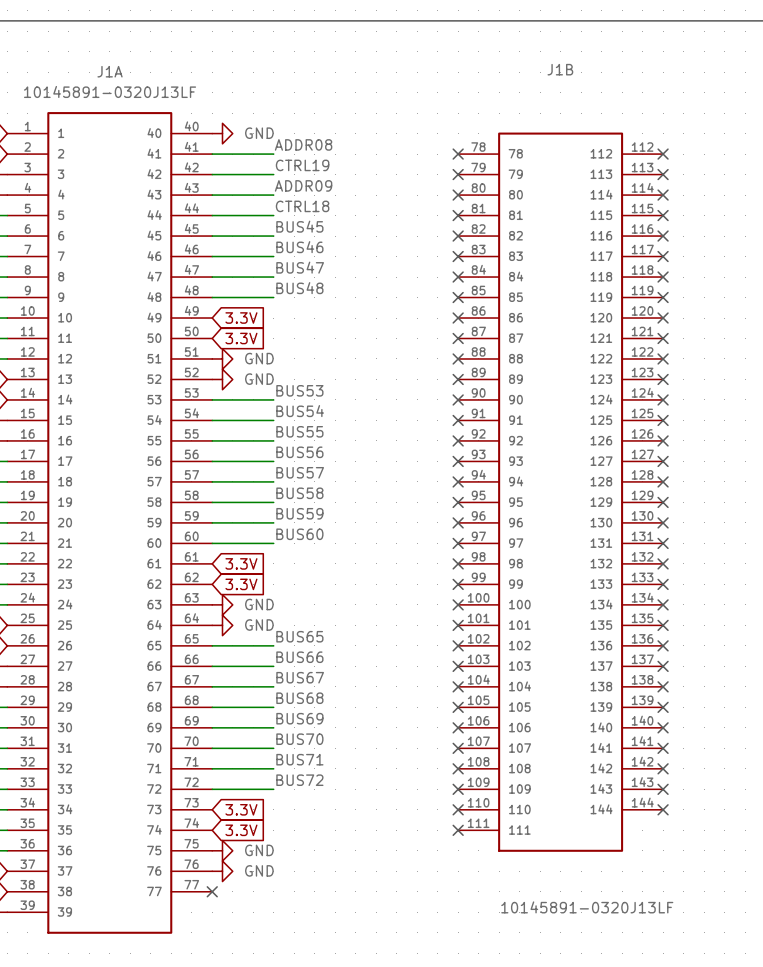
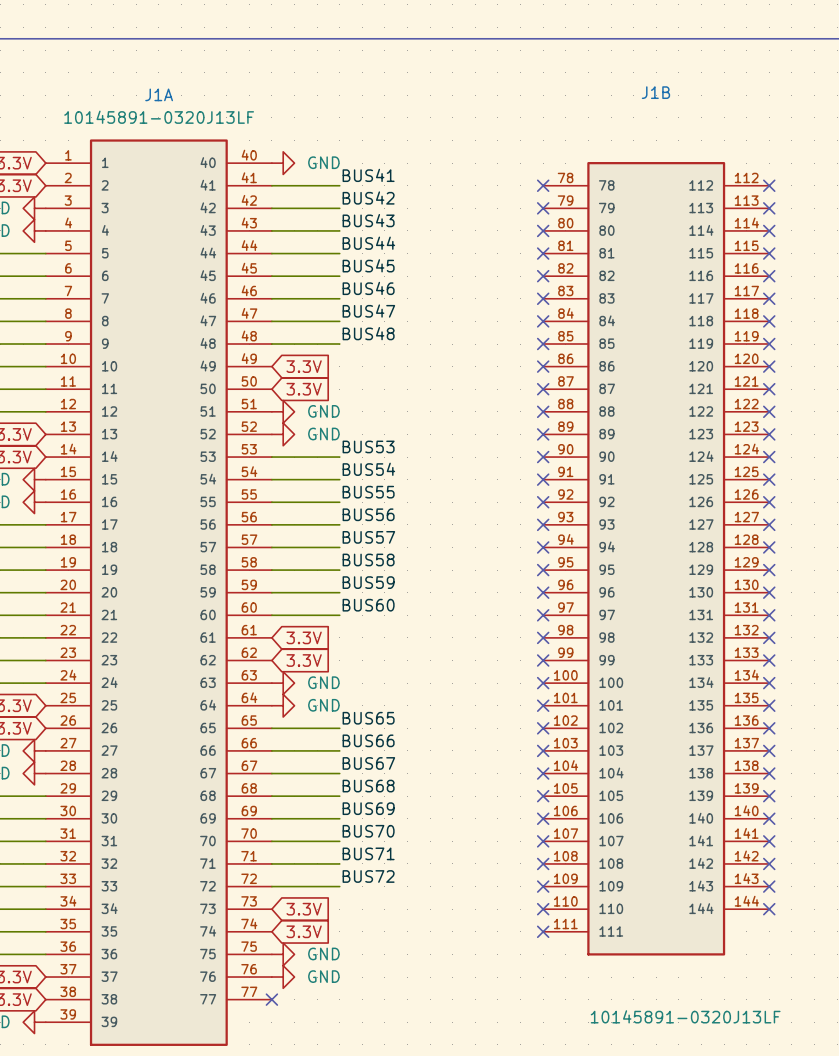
label: ADDR08 (303, 144) -> BUS41 (368, 175)
label: CTRL19 (302, 165) -> BUS42 (368, 197)
label: ADDR09 (303, 185) -> BUS43 (368, 220)
label: CTRL18 (302, 206) -> BUS44 (368, 243)

